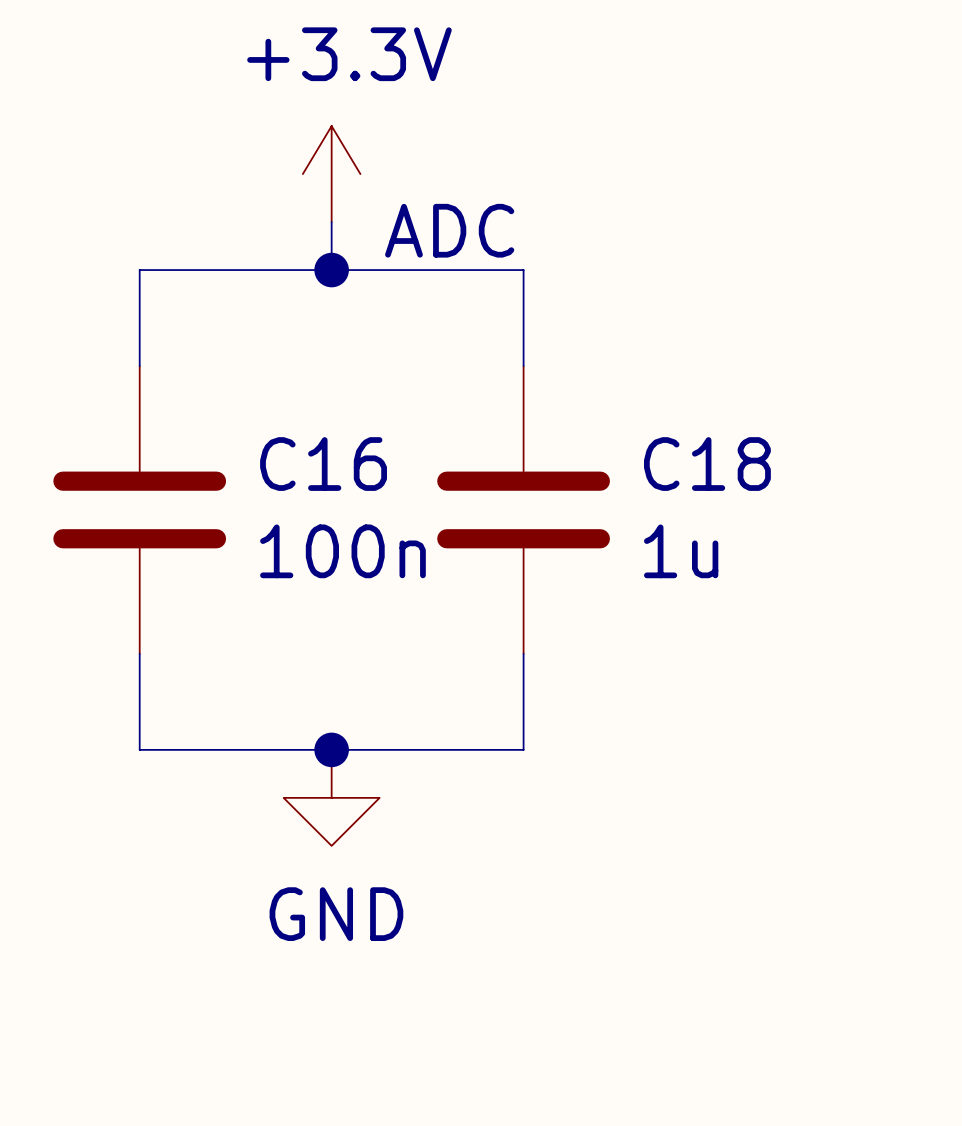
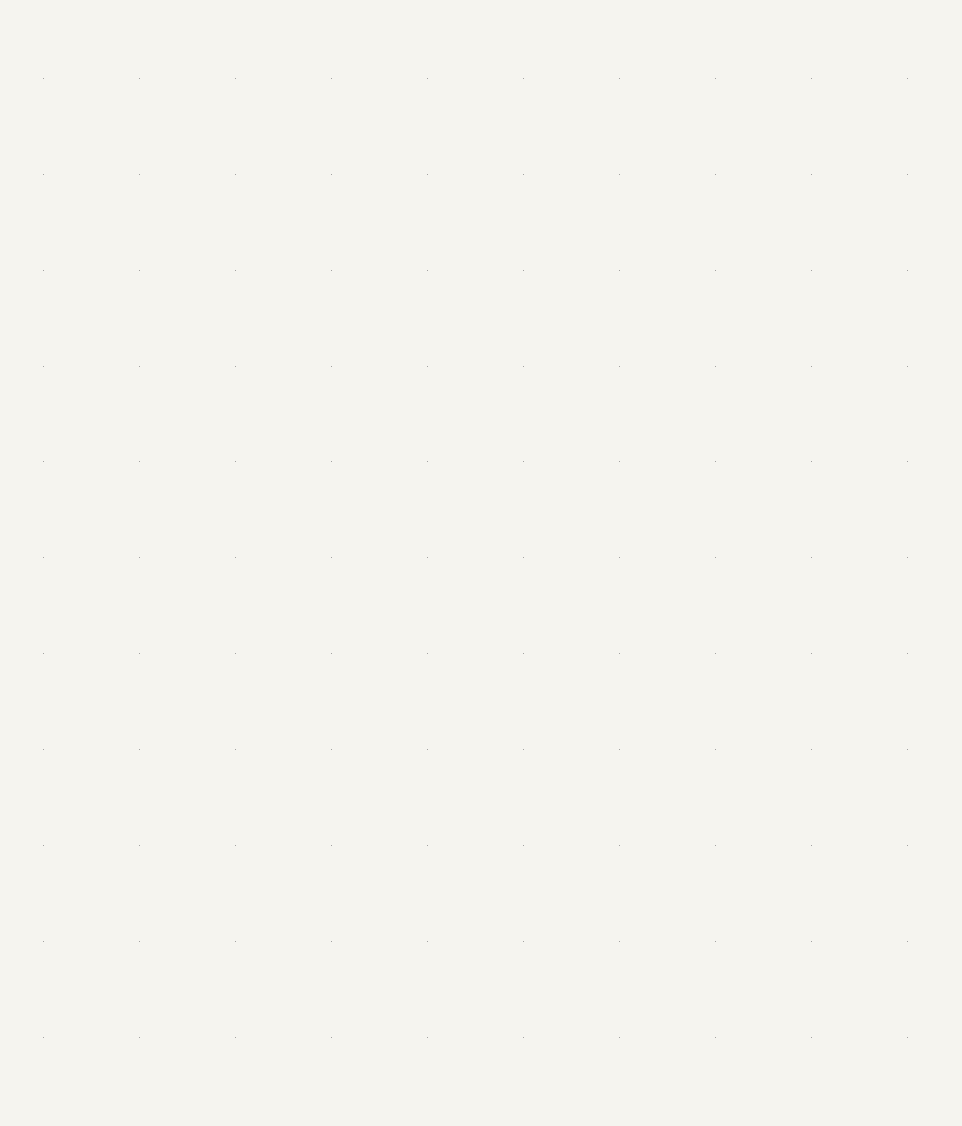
power symbol: +3.3V (331, 174) -> none
wire: (331, 222) (331, 270) -> none
text: ADC (449, 230) -> none
junction: (331, 270) -> none
wire: (139, 366) (139, 270) (523, 270) (523, 366) -> none
C16: 100n (139, 509) -> none
C18: 1u (523, 509) -> none
wire: (139, 653) (139, 749) (523, 749) (523, 653) -> none
junction: (331, 749) -> none
power symbol: GND (331, 797) -> none

